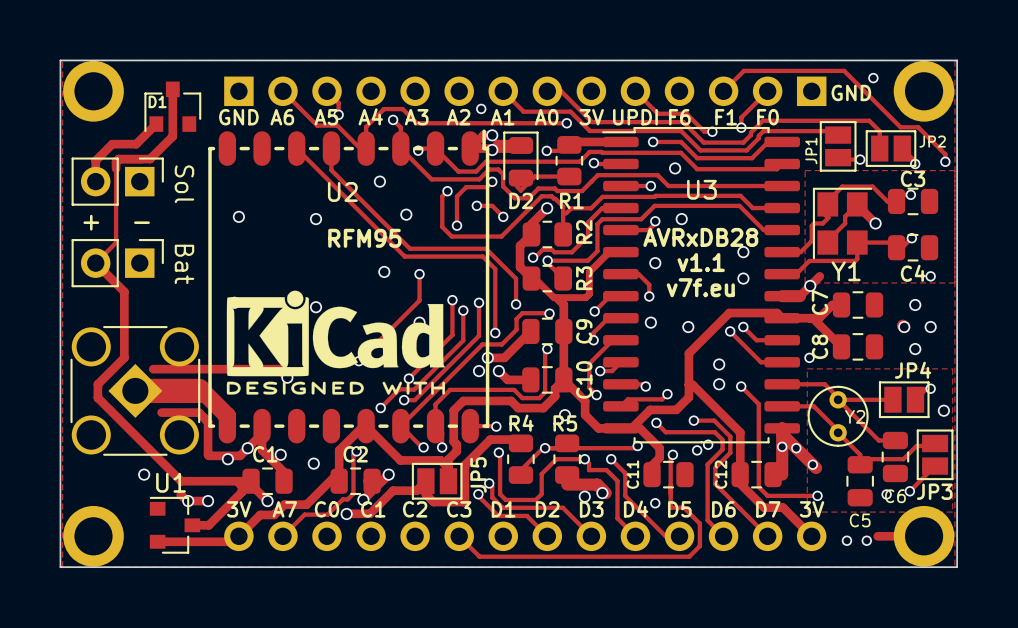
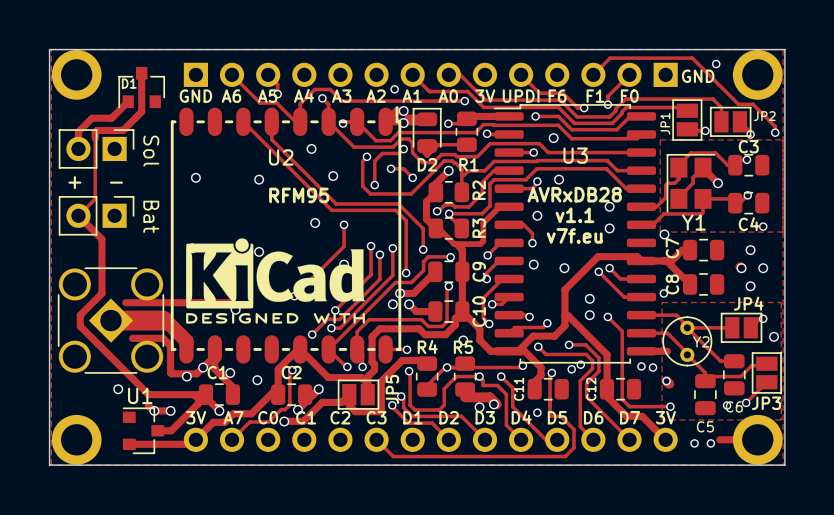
track: (819, 276) (799, 296) (782, 296) -> none
track: (782, 428) (782, 474) -> (641, 351) (667, 351)
track: (782, 434) (812, 464) -> none

